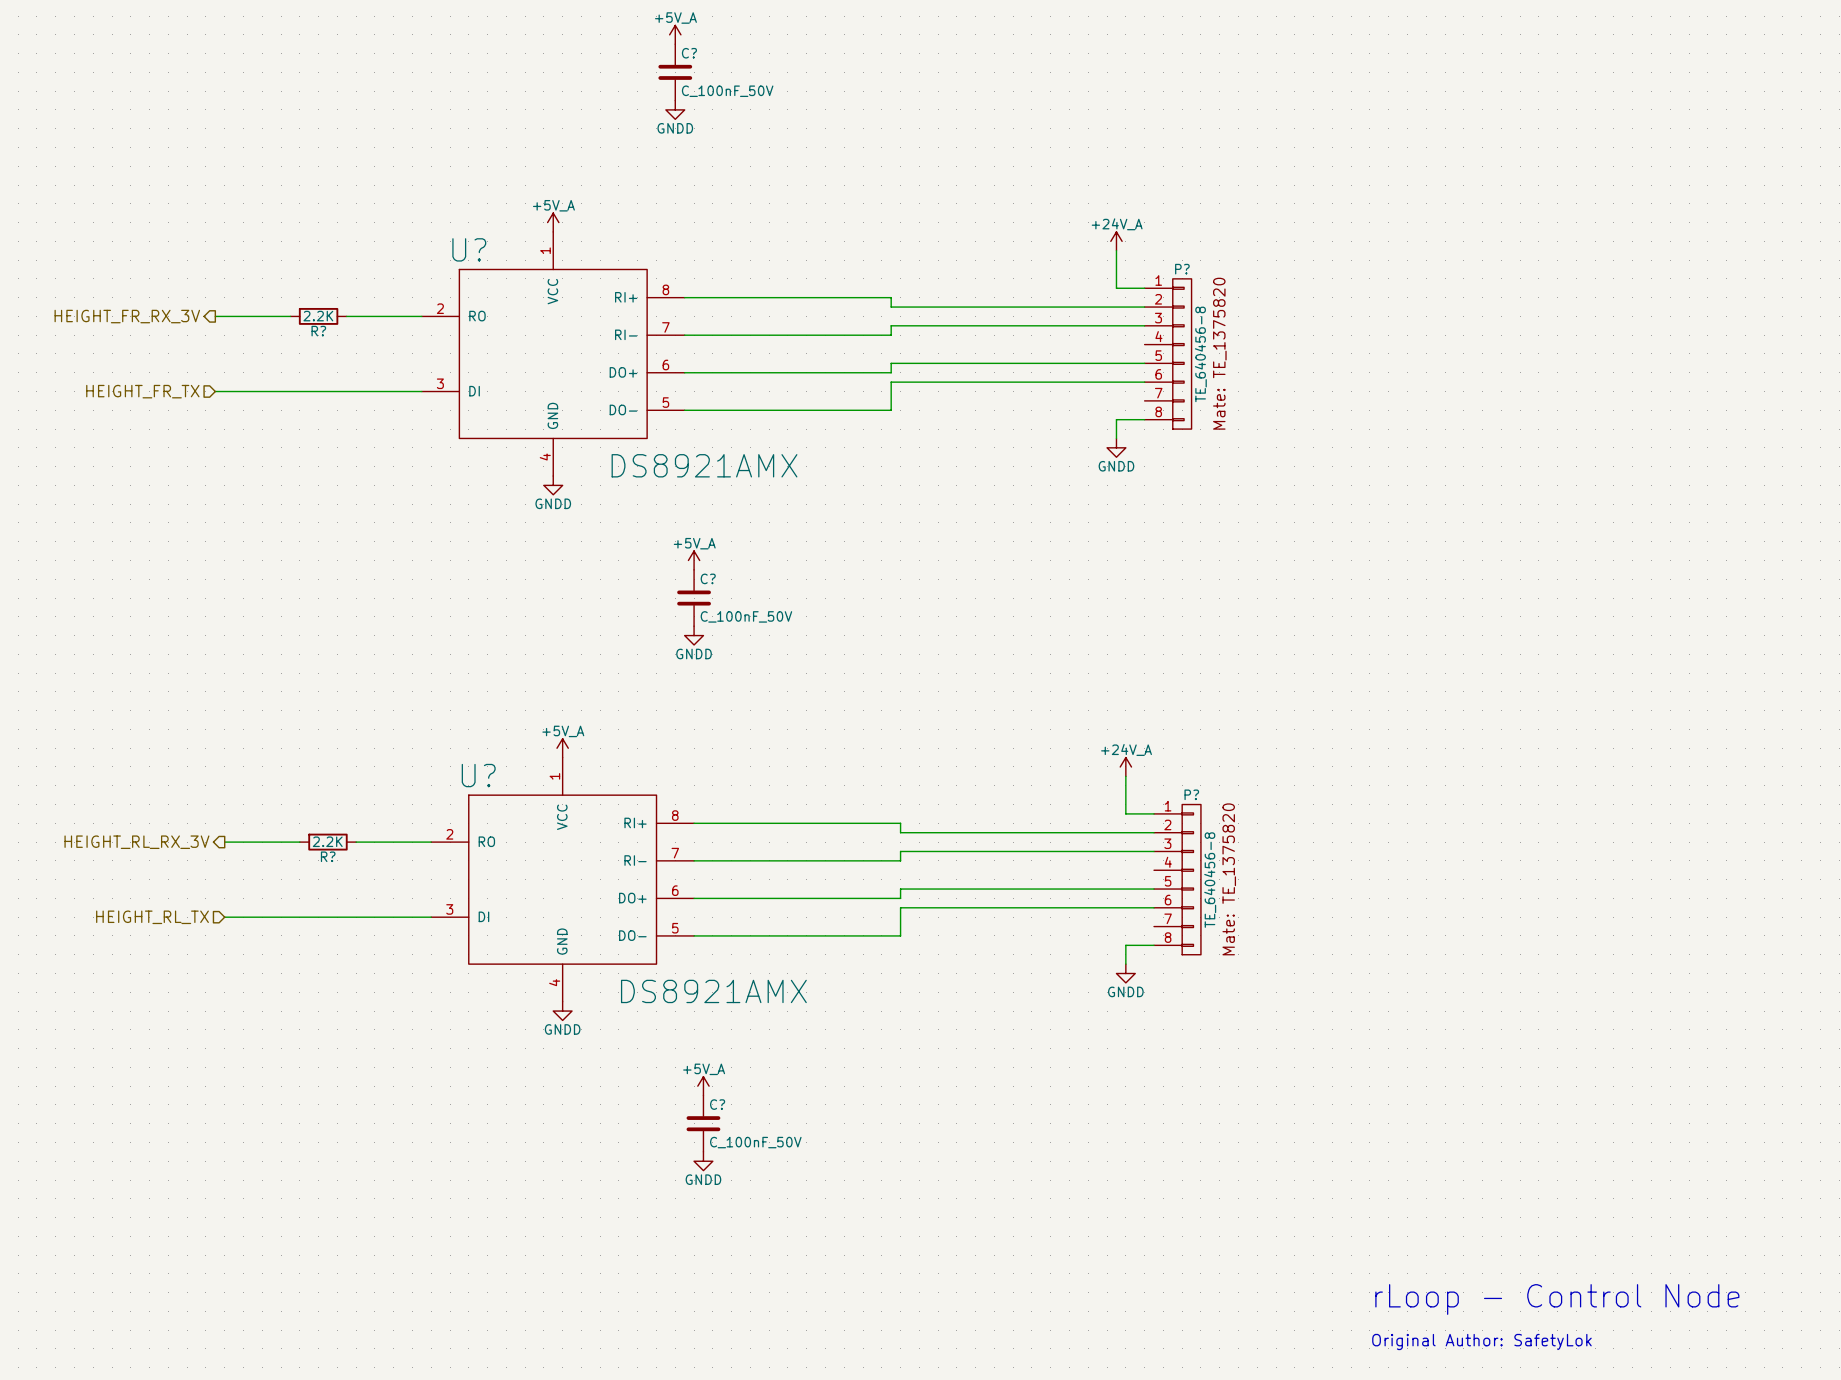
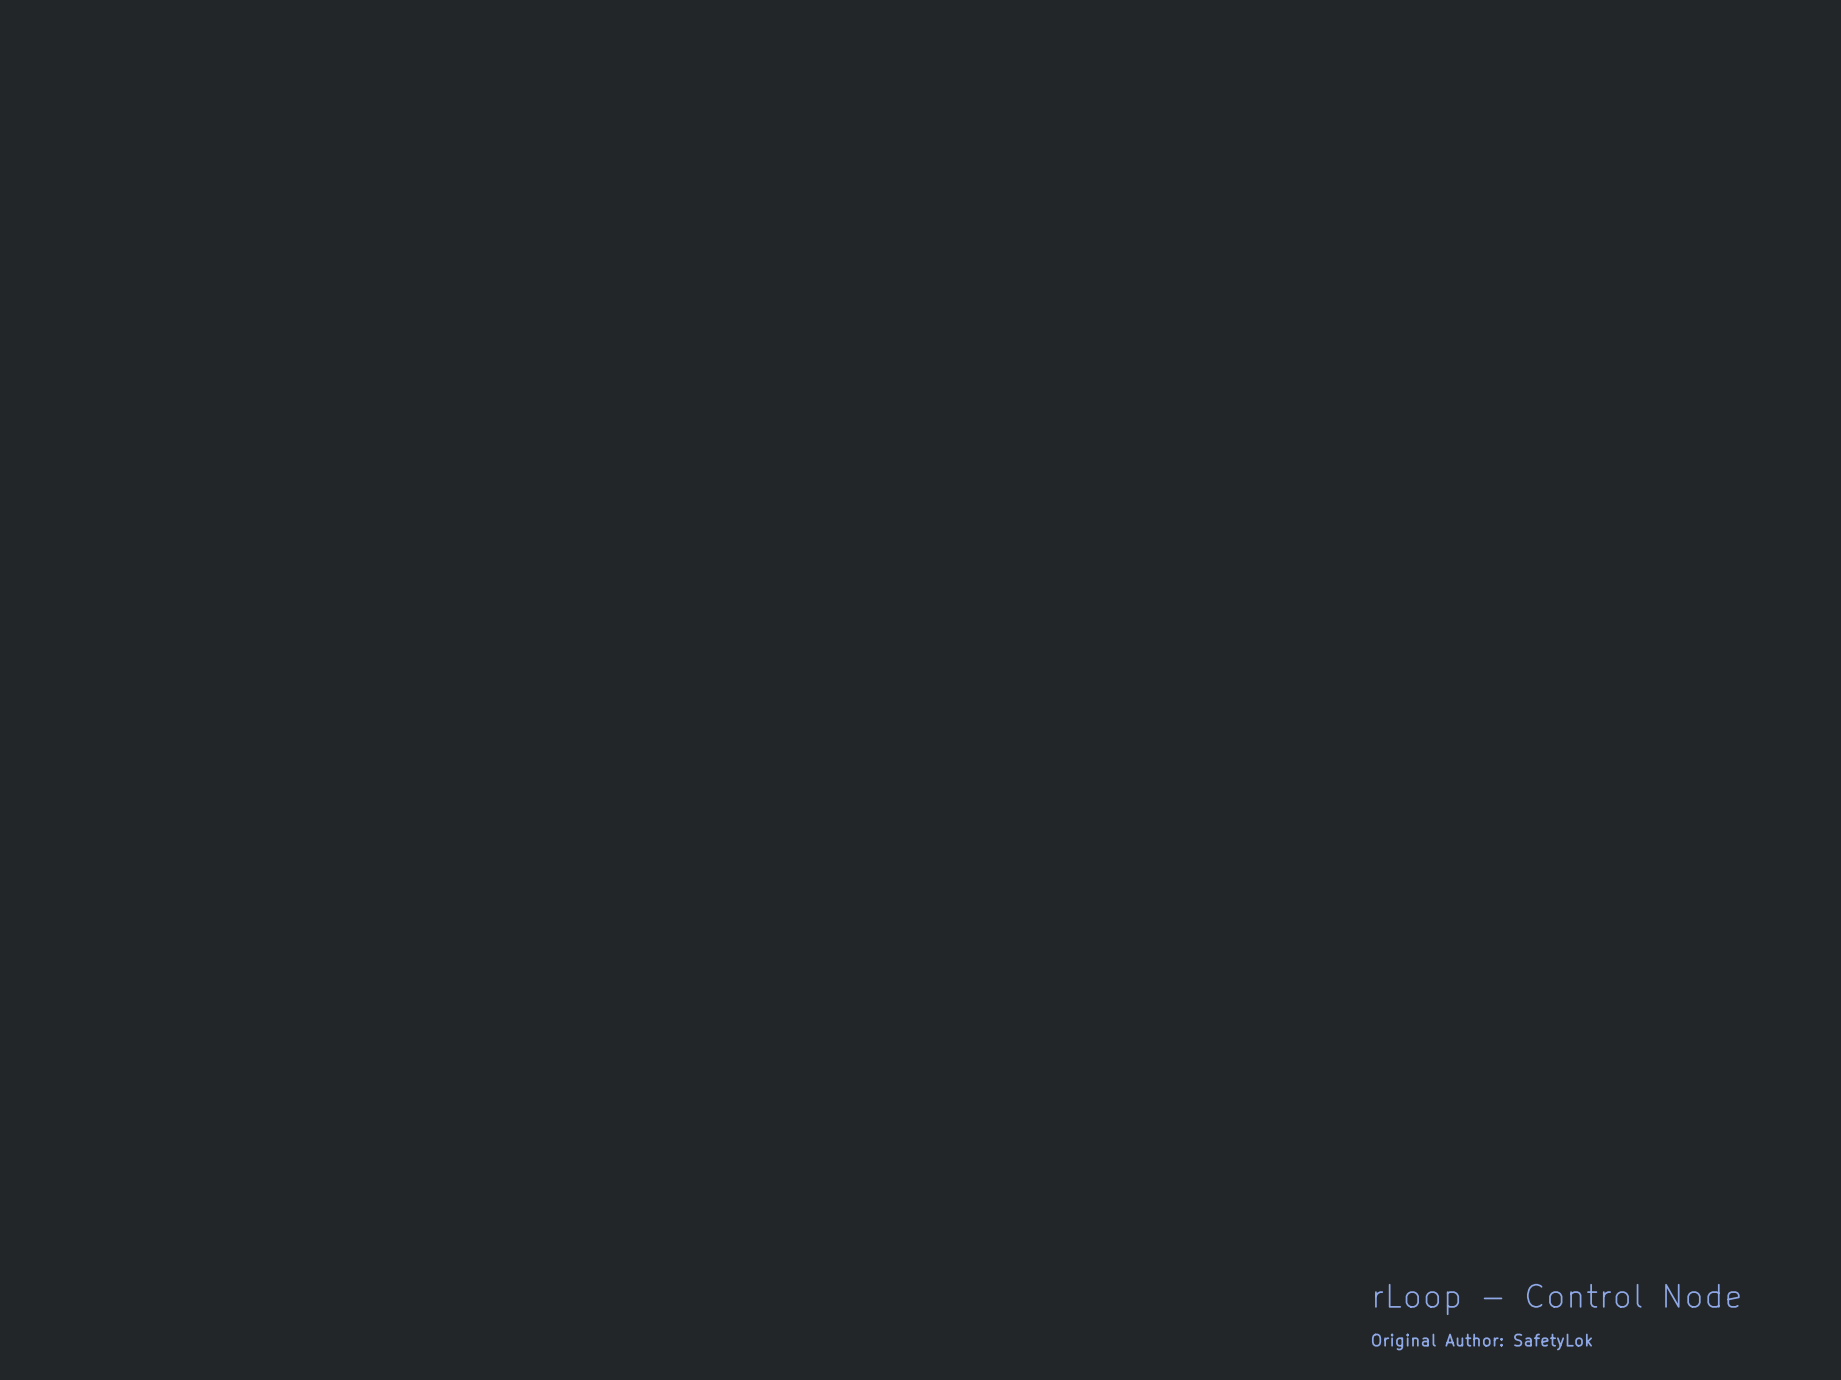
power symbol: +5V_A (675, 34) -> none
C?: C_100nF_50V (675, 72) -> none
power symbol: GNDD (675, 109) -> none
power symbol: +5V_A (553, 222) -> none
power symbol: +24V_A (1116, 241) -> none
wire: (1116, 250) (1116, 288) (1144, 288) -> none
wire: (684, 297) (891, 297) (891, 307) (1144, 307) -> none
hierarchical label: HEIGHT_FR_RX_3V (127, 316) -> none
wire: (215, 316) (290, 316) -> none
R?: 2.2K (318, 316) -> none
wire: (346, 316) (421, 316) -> none
wire: (1144, 325) (891, 325) (891, 335) (684, 335) -> none
U?: DS8921AMX (553, 353) -> none
P?: TE_640456-8 (1168, 353) -> none
wire: (1144, 363) (891, 363) (891, 372) (684, 372) -> none
wire: (1144, 382) (891, 382) (891, 410) (684, 410) -> none
hierarchical label: HEIGHT_FR_TX (142, 391) -> none
wire: (215, 391) (421, 391) -> none
wire: (1144, 419) (1116, 419) (1116, 438) -> none
power symbol: GNDD (1116, 447) -> none
power symbol: GNDD (553, 485) -> none
power symbol: +5V_A (694, 560) -> none
C?: C_100nF_50V (694, 598) -> none
power symbol: GNDD (694, 635) -> none
power symbol: +5V_A (562, 748) -> none
power symbol: +24V_A (1125, 766) -> none
wire: (1125, 776) (1125, 813) (1154, 813) -> none
wire: (694, 823) (900, 823) (900, 832) (1154, 832) -> none
hierarchical label: HEIGHT_RL_RX_3V (136, 842) -> none
wire: (224, 842) (299, 842) -> none
R?: 2.2K (327, 842) -> none
wire: (356, 842) (431, 842) -> none
wire: (1154, 851) (900, 851) (900, 860) (694, 860) -> none
U?: DS8921AMX (562, 879) -> none
P?: TE_640456-8 (1177, 879) -> none
wire: (1154, 889) (900, 889) (900, 898) (694, 898) -> none
wire: (1154, 907) (900, 907) (900, 935) (694, 935) -> none
hierarchical label: HEIGHT_RL_TX (152, 917) -> none
wire: (224, 917) (431, 917) -> none
wire: (1154, 945) (1125, 945) (1125, 964) -> none
power symbol: GNDD (1125, 973) -> none
power symbol: GNDD (562, 1011) -> none
power symbol: +5V_A (703, 1086) -> none
C?: C_100nF_50V (703, 1123) -> none
power symbol: GNDD (703, 1161) -> none

